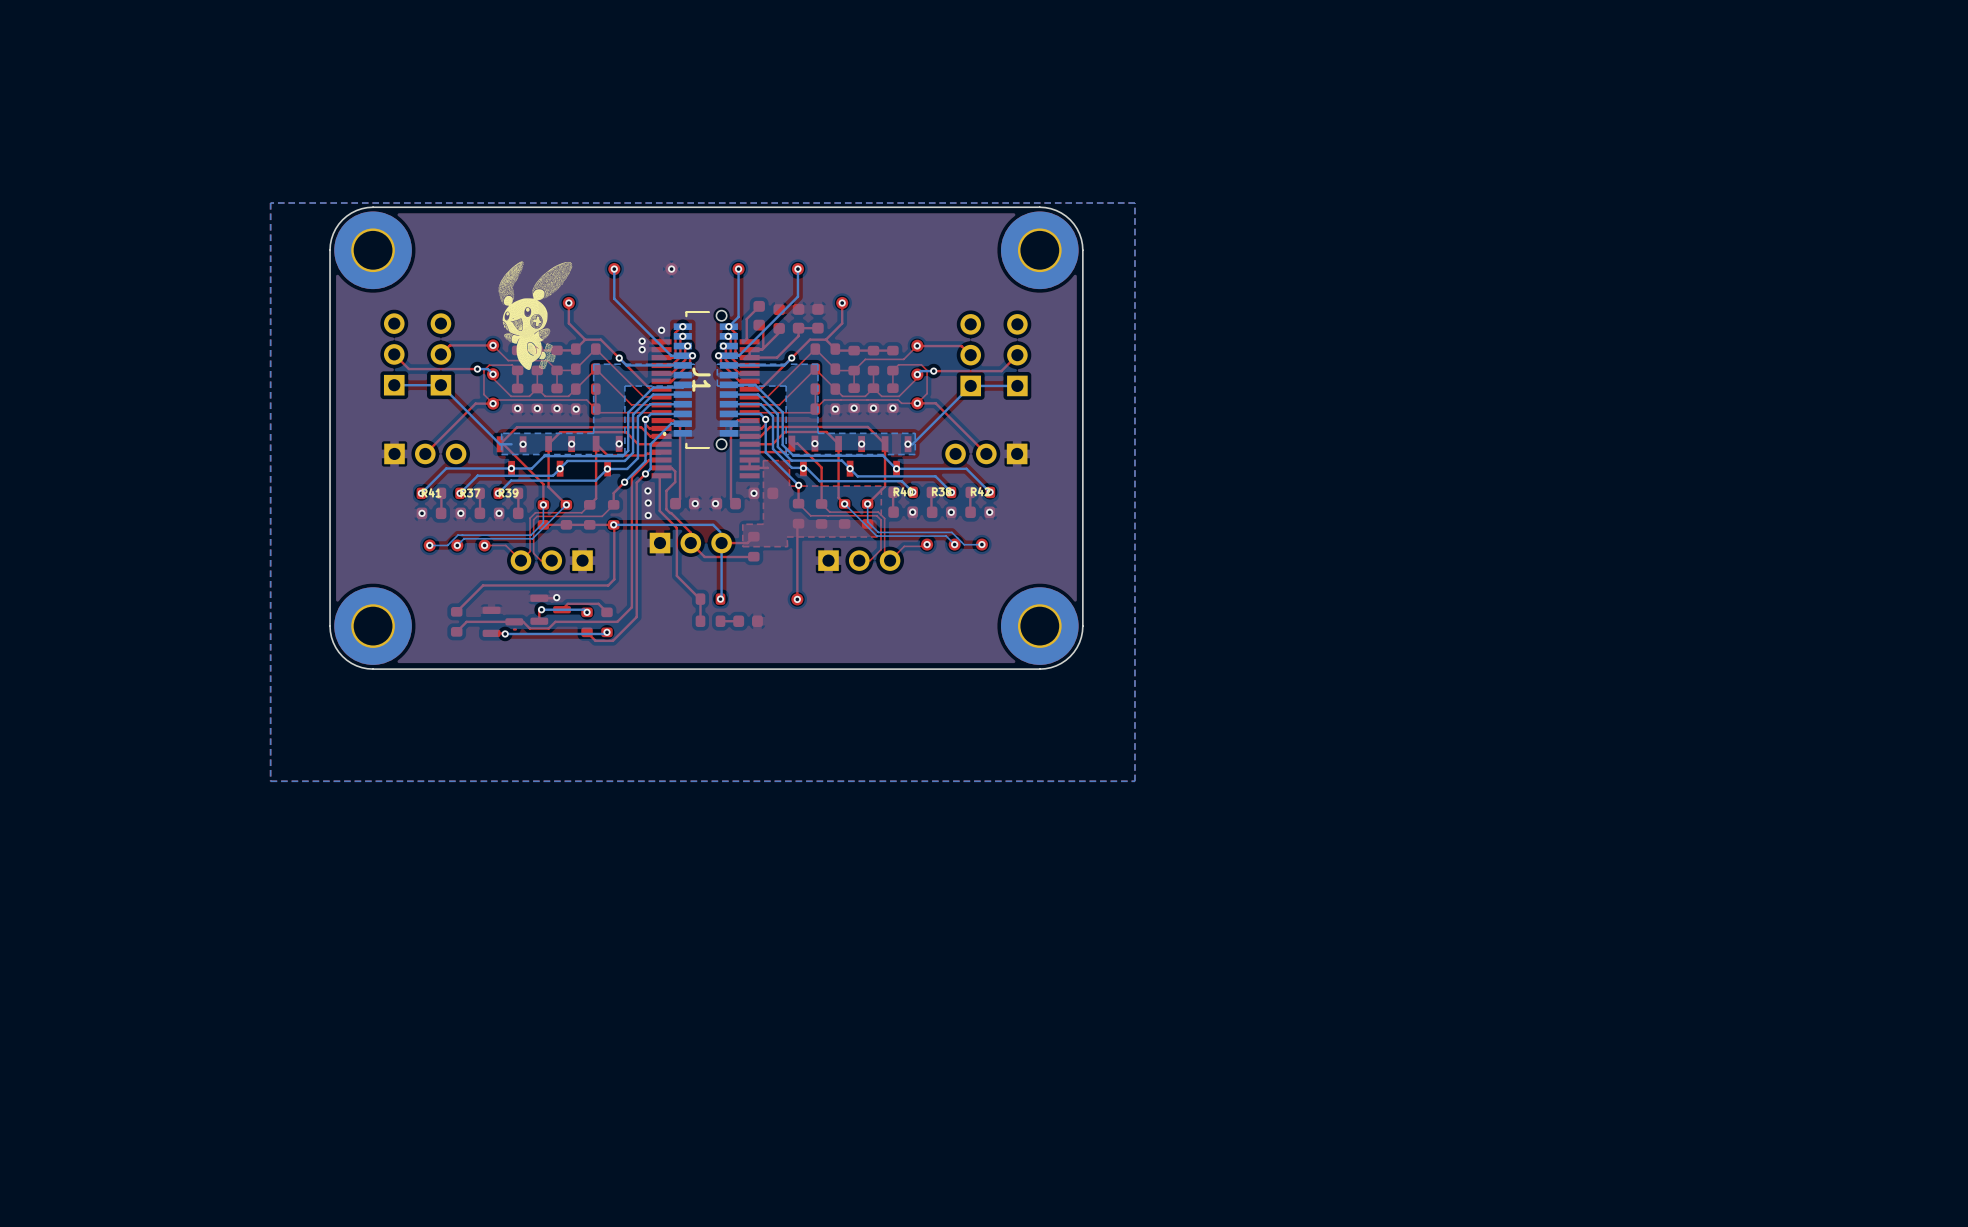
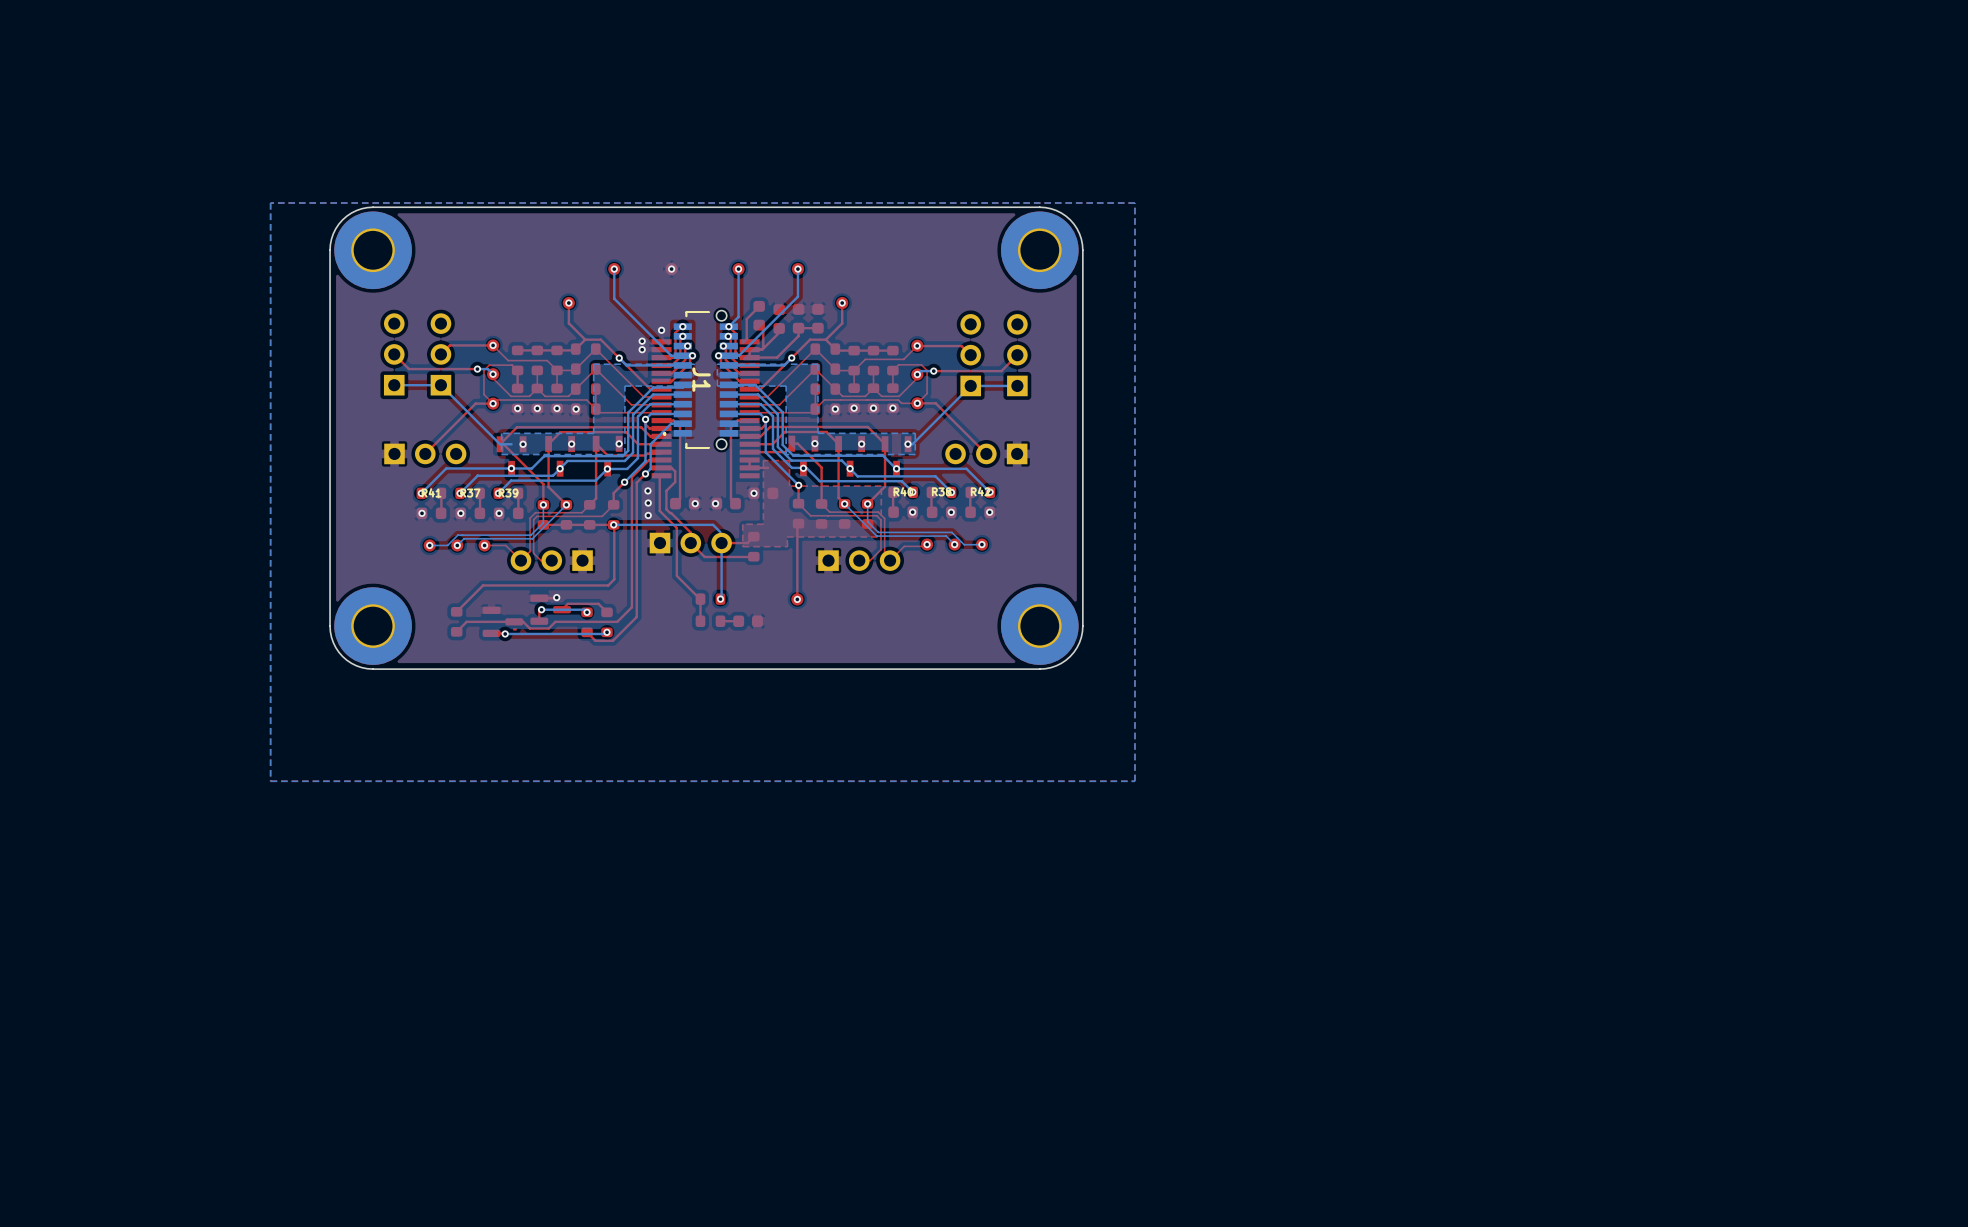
drawing: [498, 261, 573, 370] -> none

